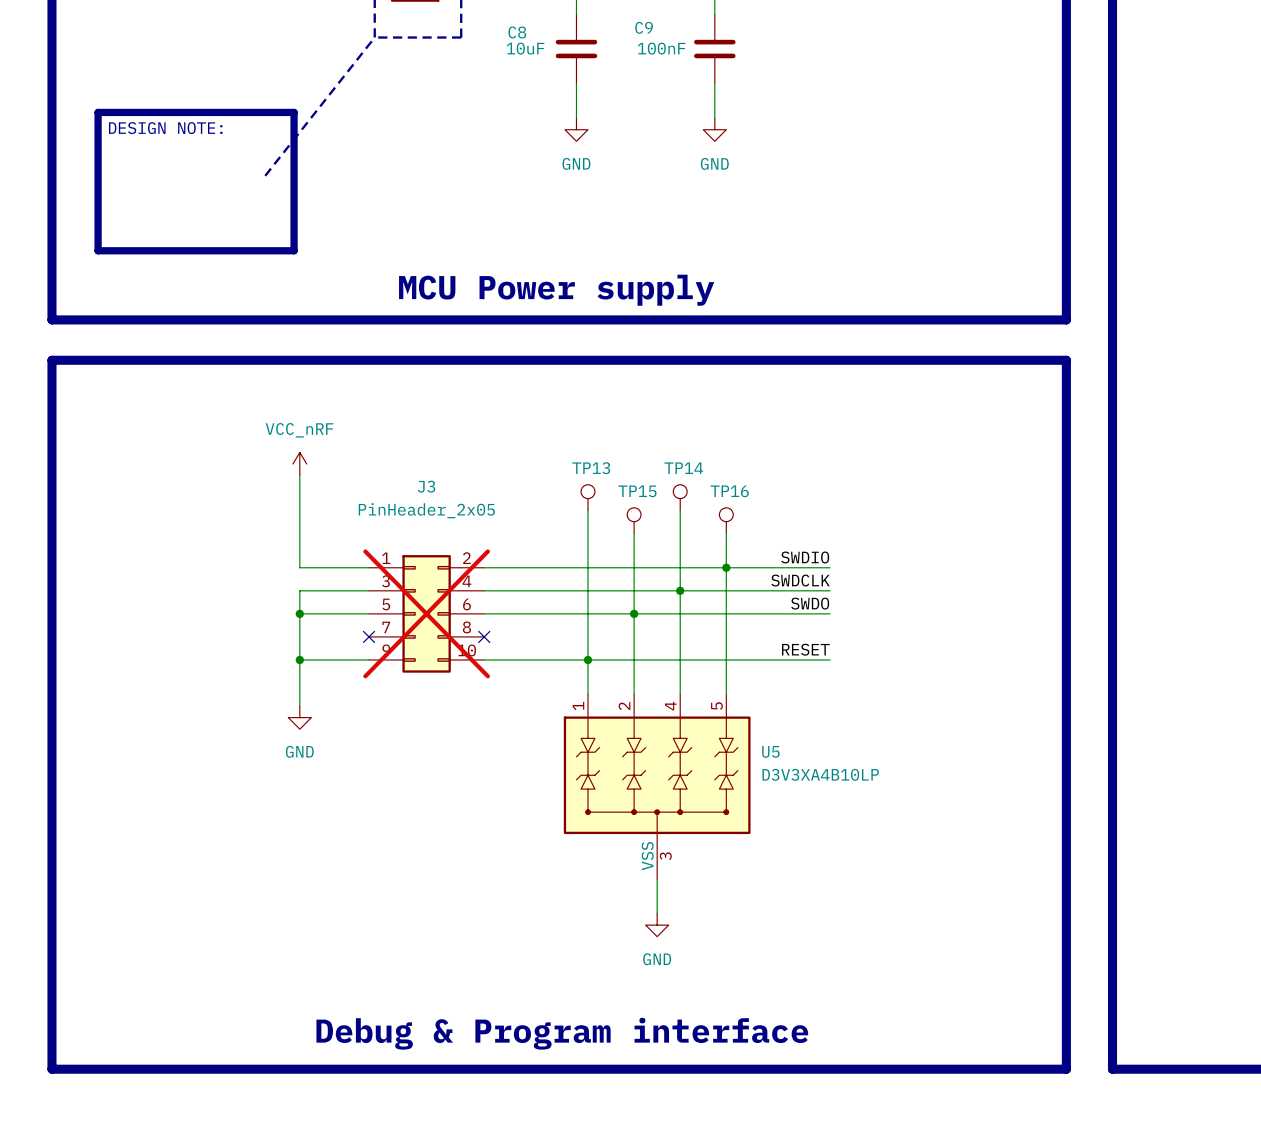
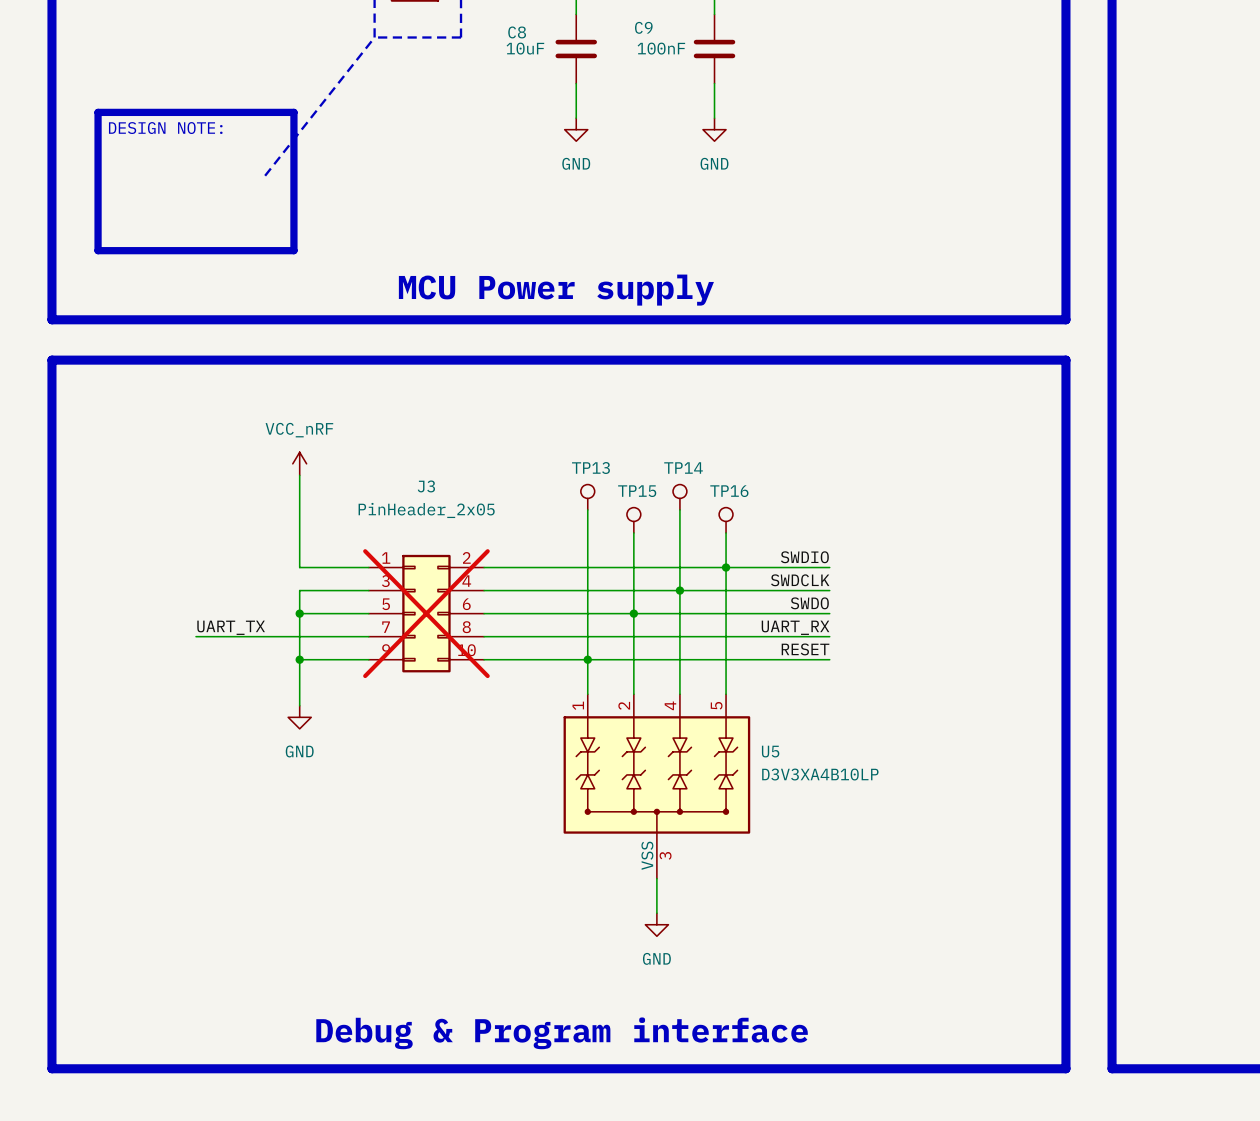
label: none -> UART_TX (231, 627)
label: none -> UART_RX (795, 627)
wire: none -> (195, 636) (368, 636)
no-connect mark: (368, 636) -> none
wire: none -> (484, 636) (829, 636)
no-connect mark: (484, 636) -> none

